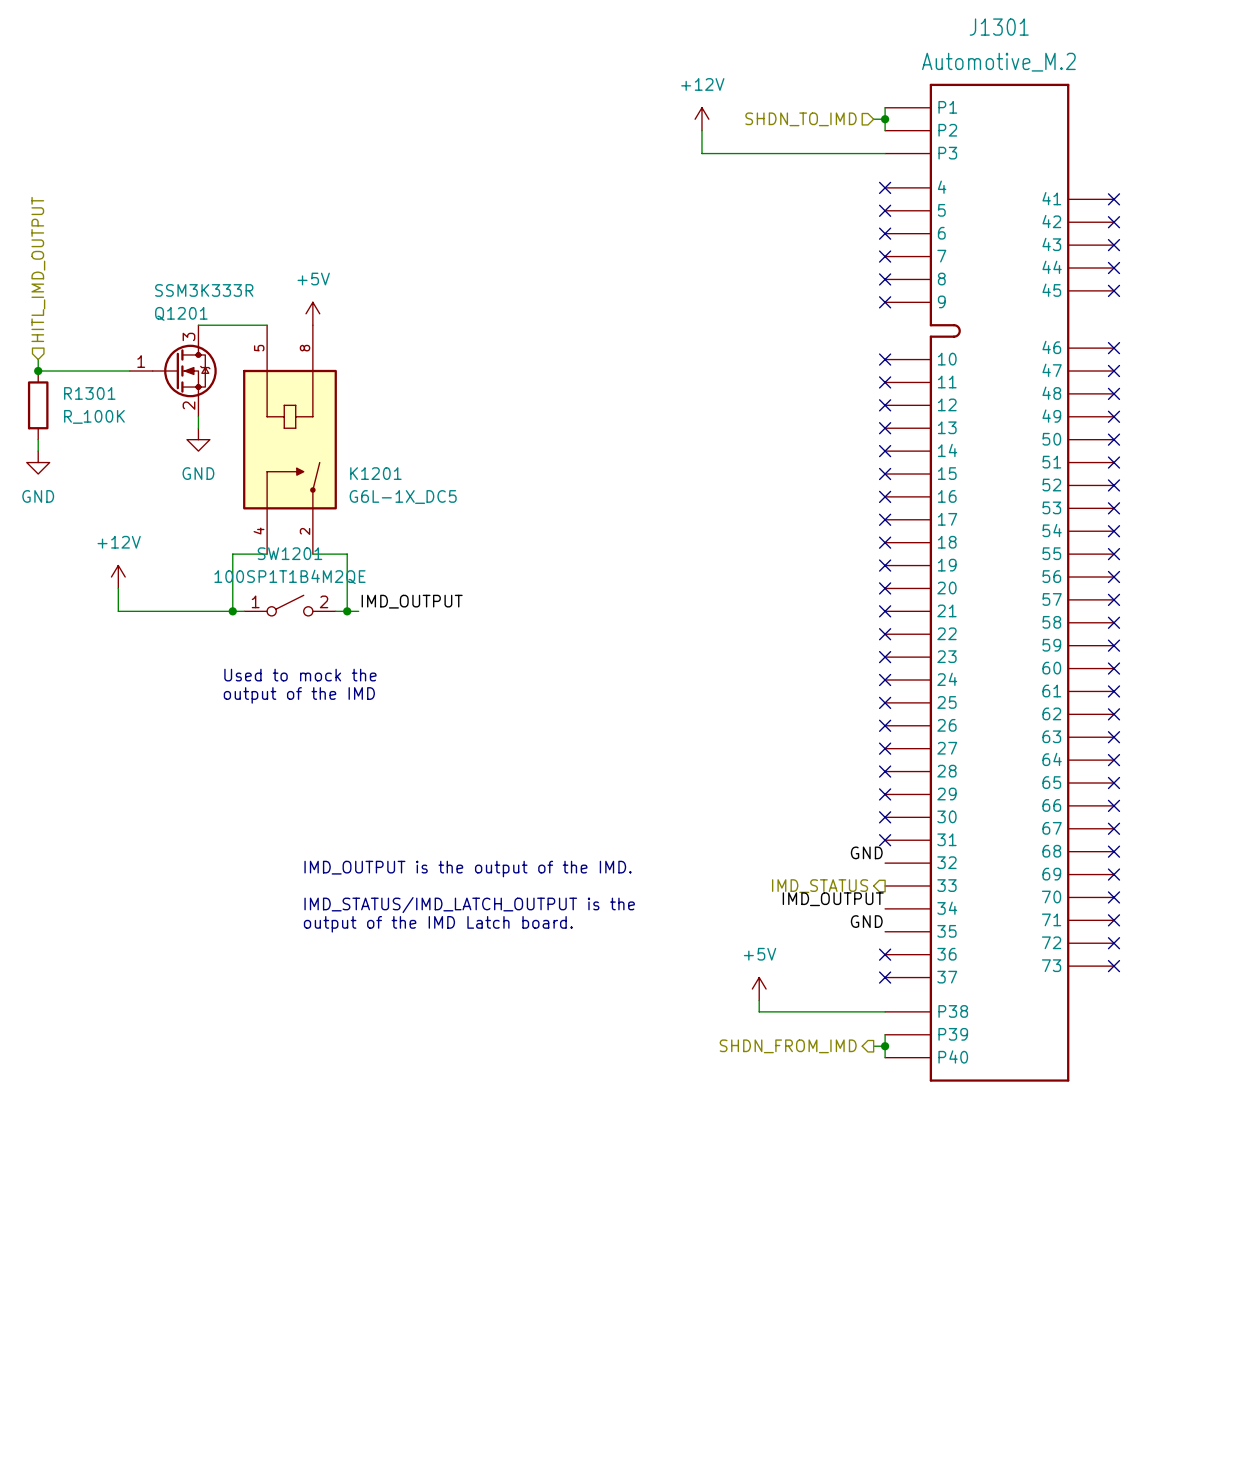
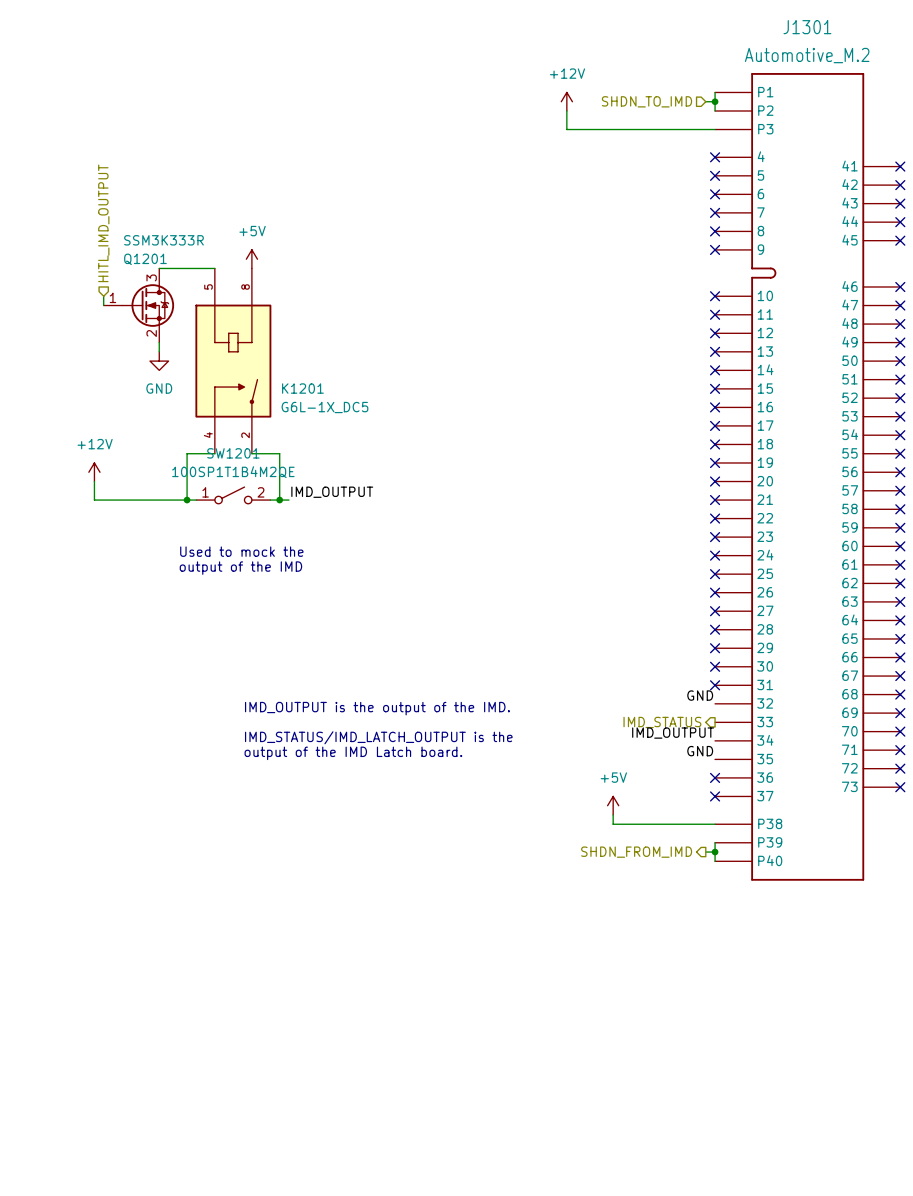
hierarchical label position: HITL_IMD_OUTPUT (38, 269) -> HITL_IMD_OUTPUT (103, 223)
wire: (38, 359) (38, 371) (129, 371) -> (103, 296) (103, 305)
junction: (38, 371) -> none
R1301: R_100K (38, 405) -> none
wire: (38, 439) (38, 451) -> none
power symbol: GND (38, 462) -> none

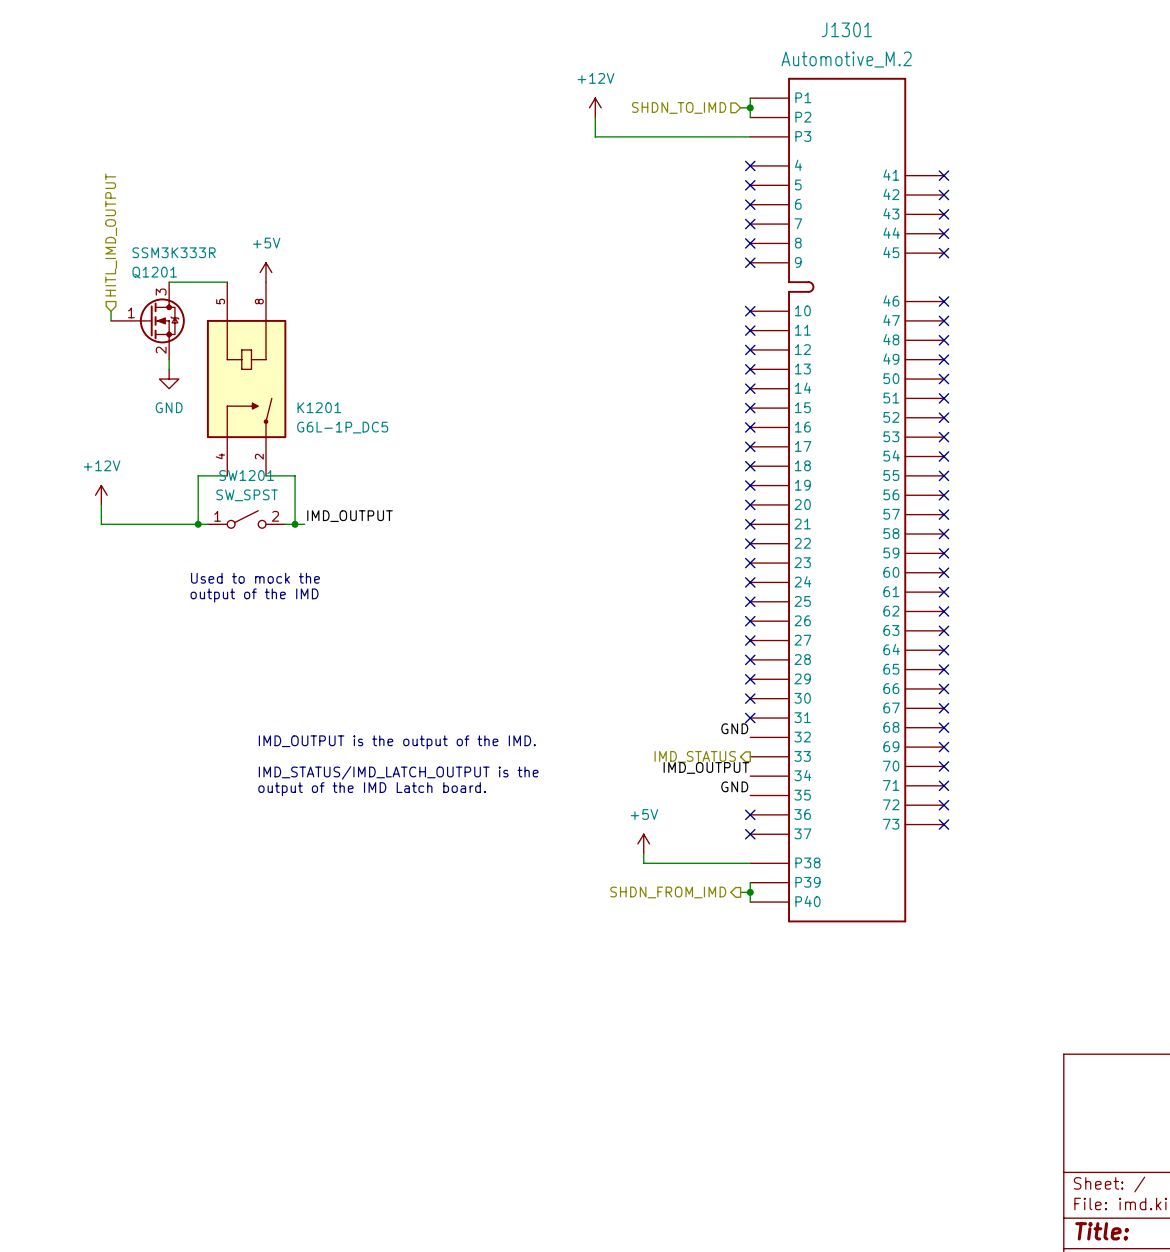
Q1201 symbol: [103, 268, 175, 343] -> [111, 282, 185, 360]
K1201 value: G6L-1X_DC5 (324, 407) -> G6L-1P_DC5 (342, 427)
SW1201 value: 100SP1T1B4M2QE (233, 472) -> SW_SPST (247, 495)

